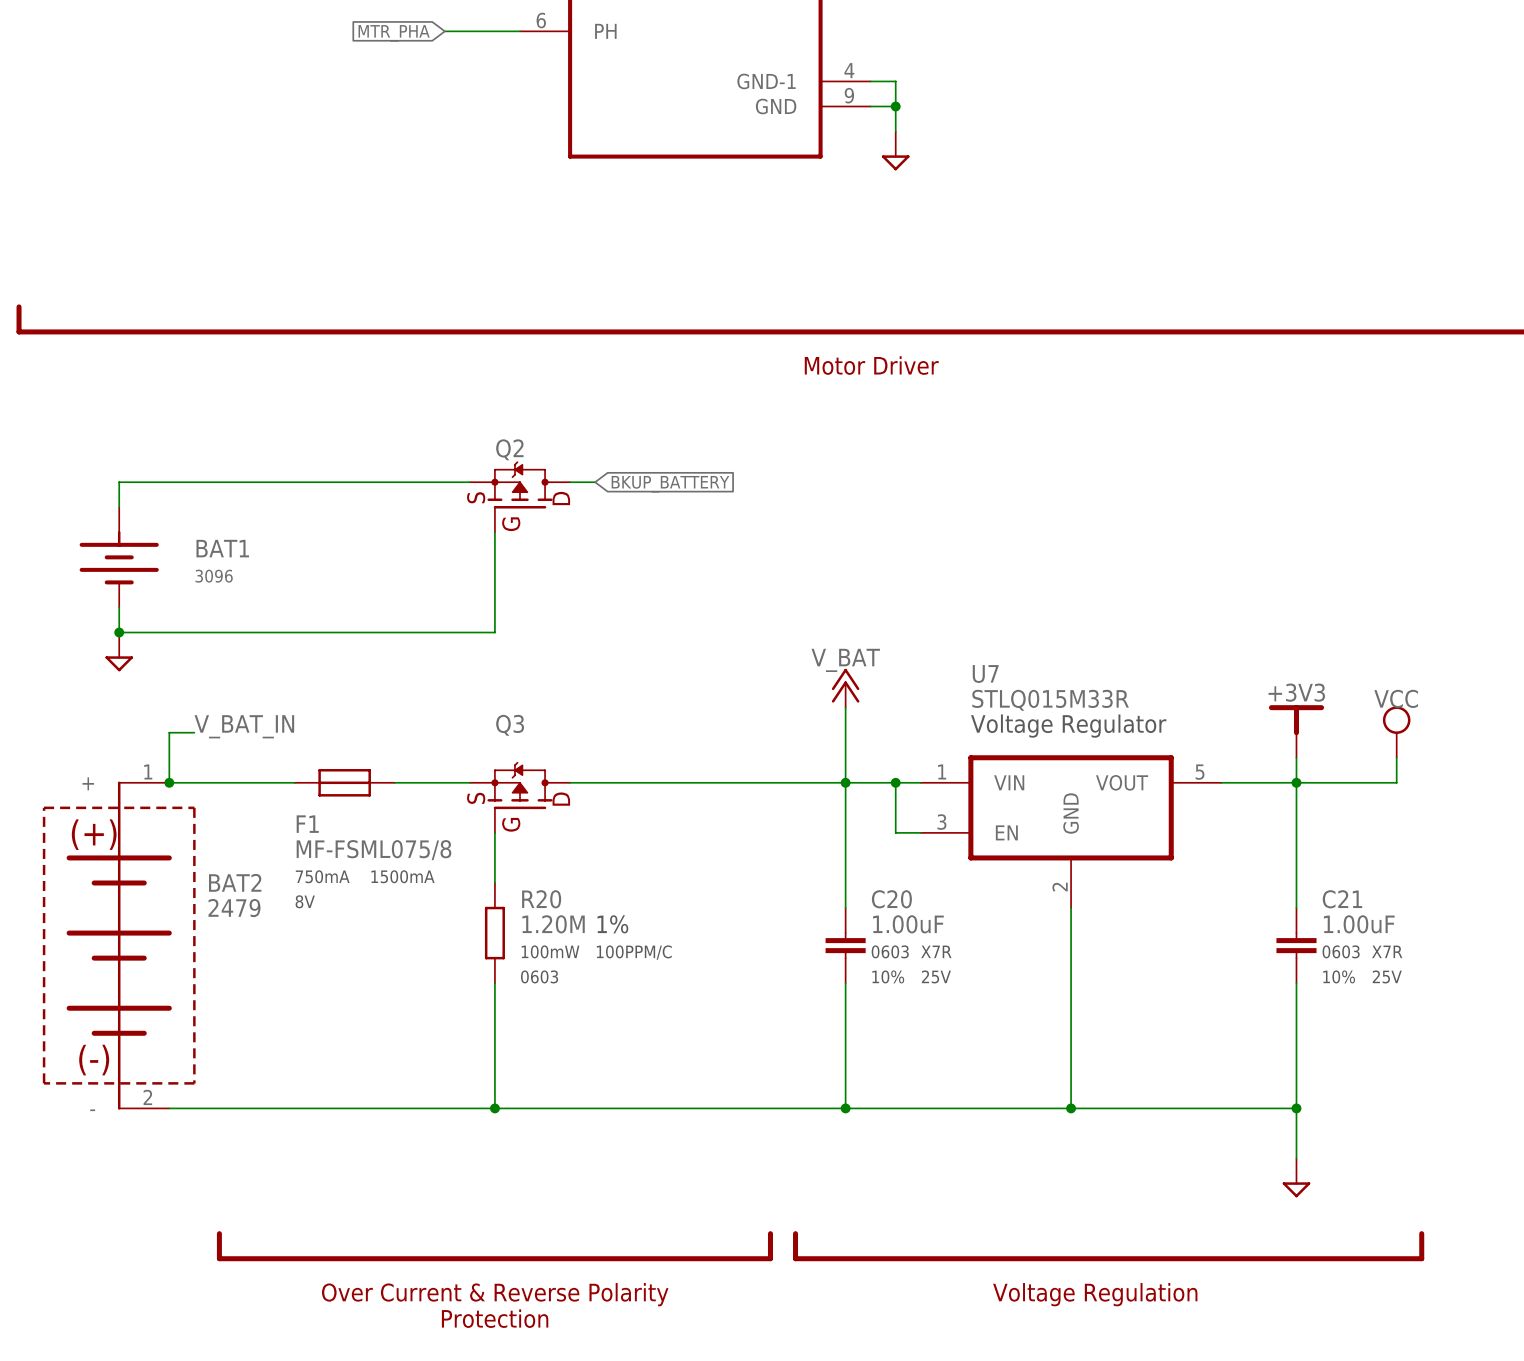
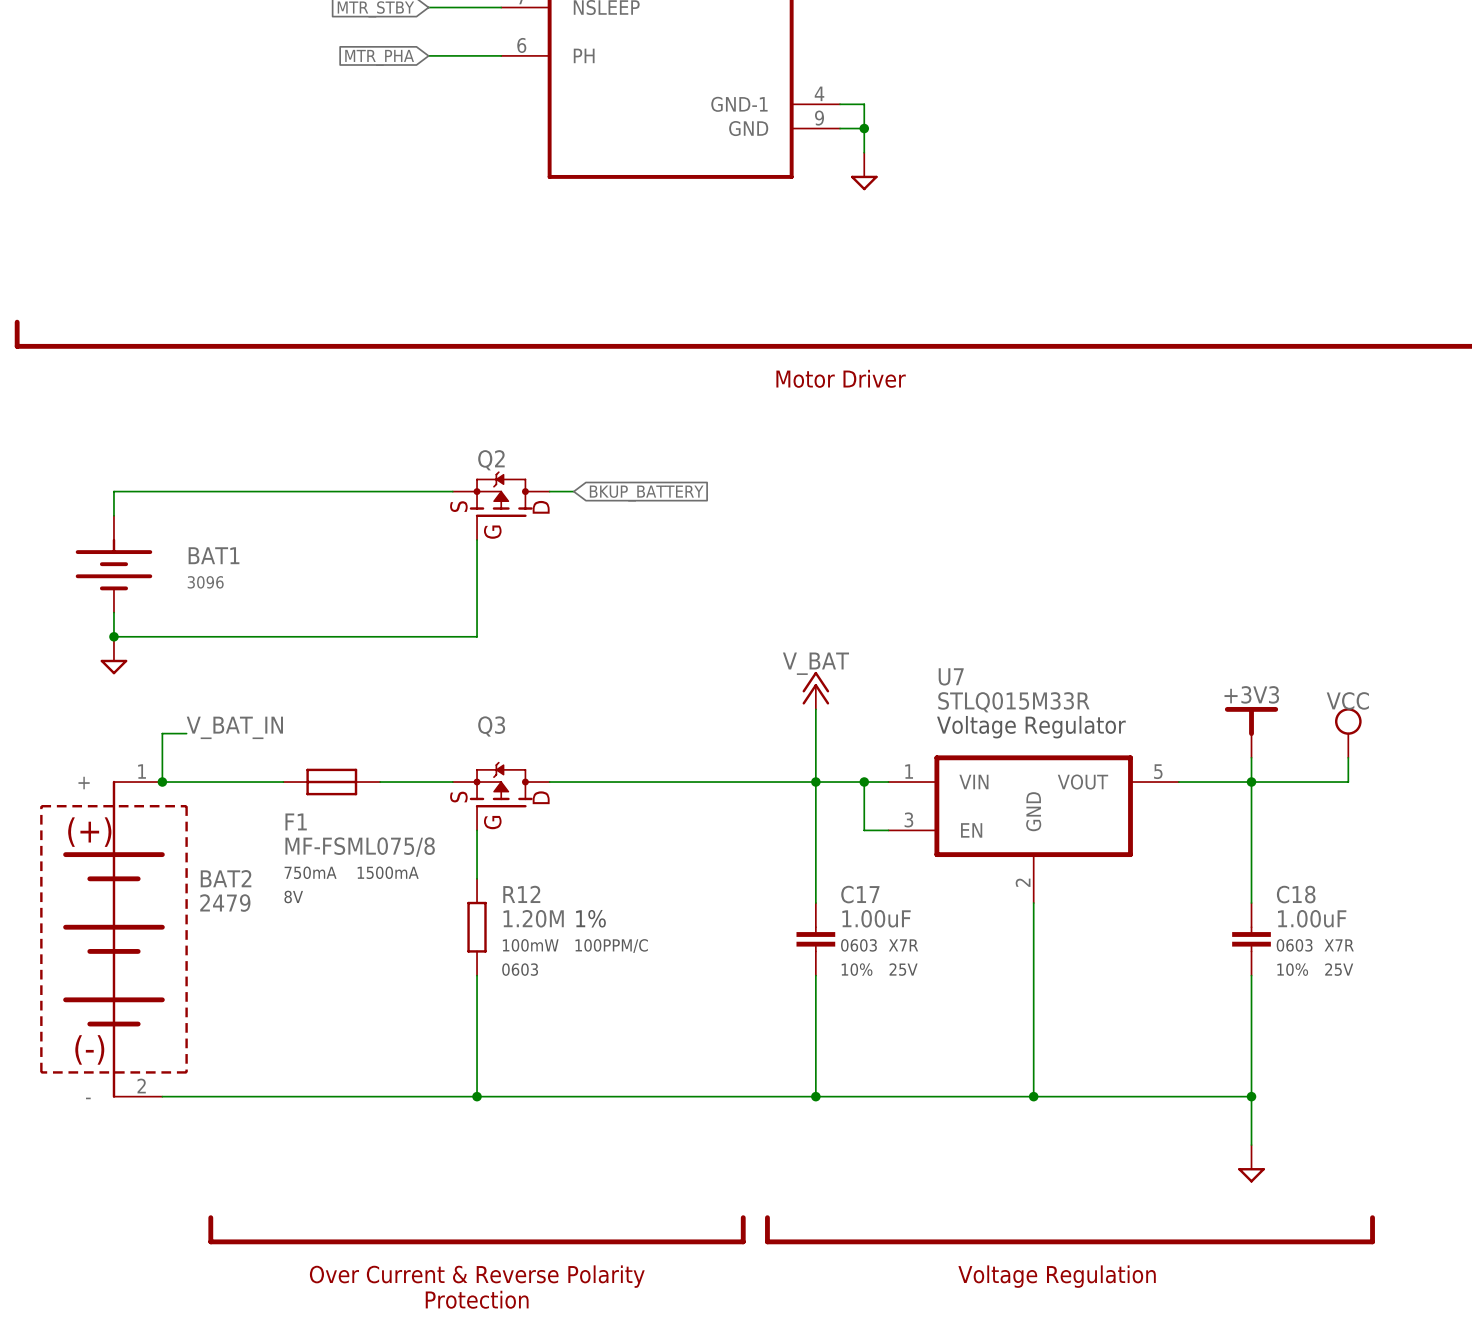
R20 name: R20 (541, 899) -> R12 (521, 894)
C20 name: C20 (891, 899) -> C17 (860, 894)
C21 name: C21 (1342, 899) -> C18 (1296, 894)

